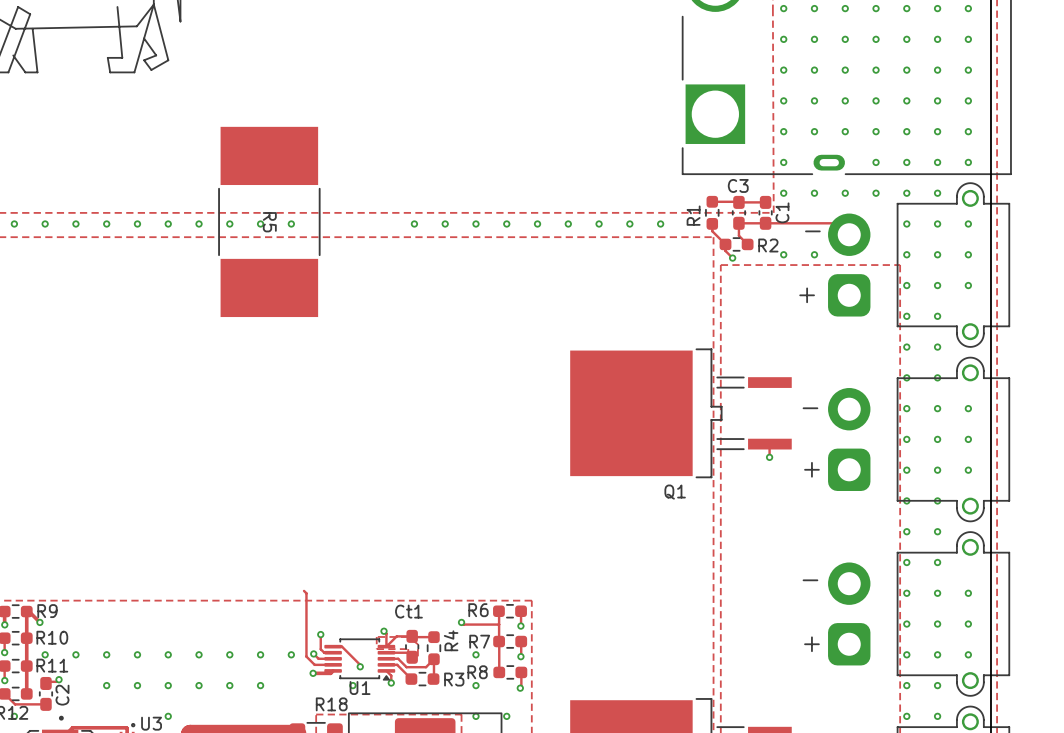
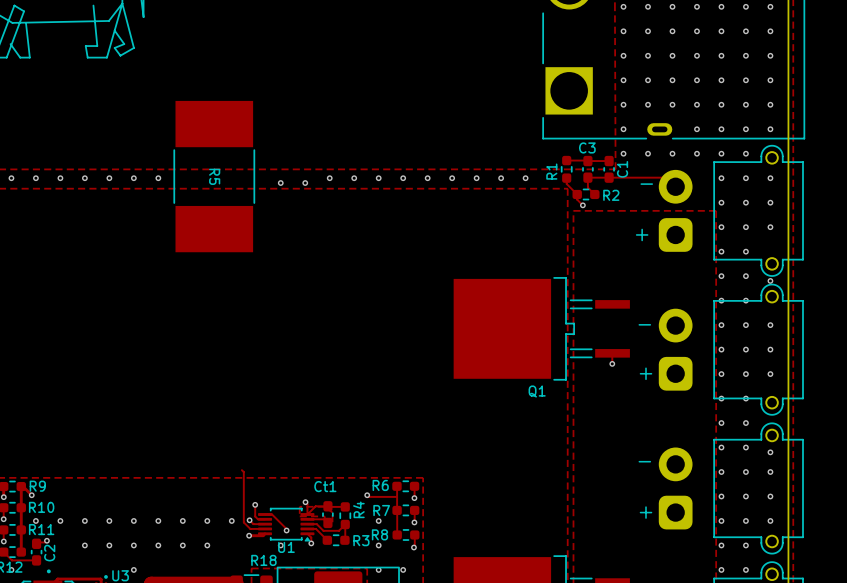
via: (229, 223) -> none
via: (260, 223) -> none
via: (291, 223) -> none
via: none -> (280, 183)
via: none -> (305, 183)
via: (783, 254) -> none
via: (814, 254) -> none
via: none -> (770, 280)
via: none -> (770, 452)

